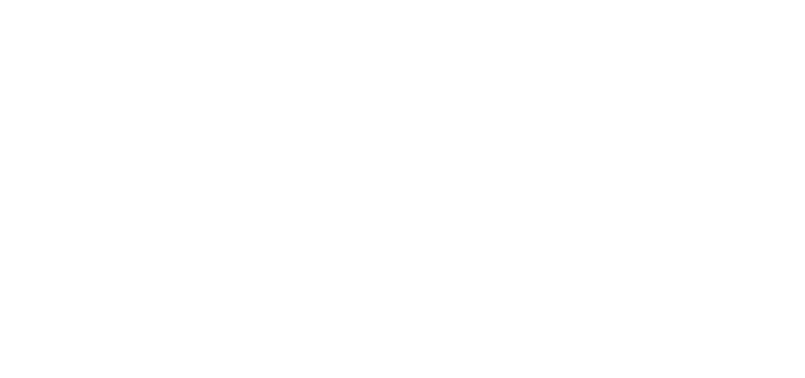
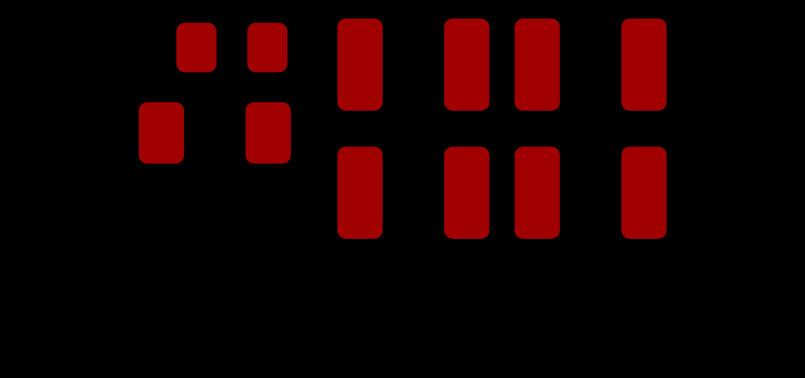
part: none -> (231, 47)
part: none -> (413, 64)
part: none -> (590, 64)
part: none -> (214, 132)
part: none -> (413, 192)
part: none -> (590, 192)

